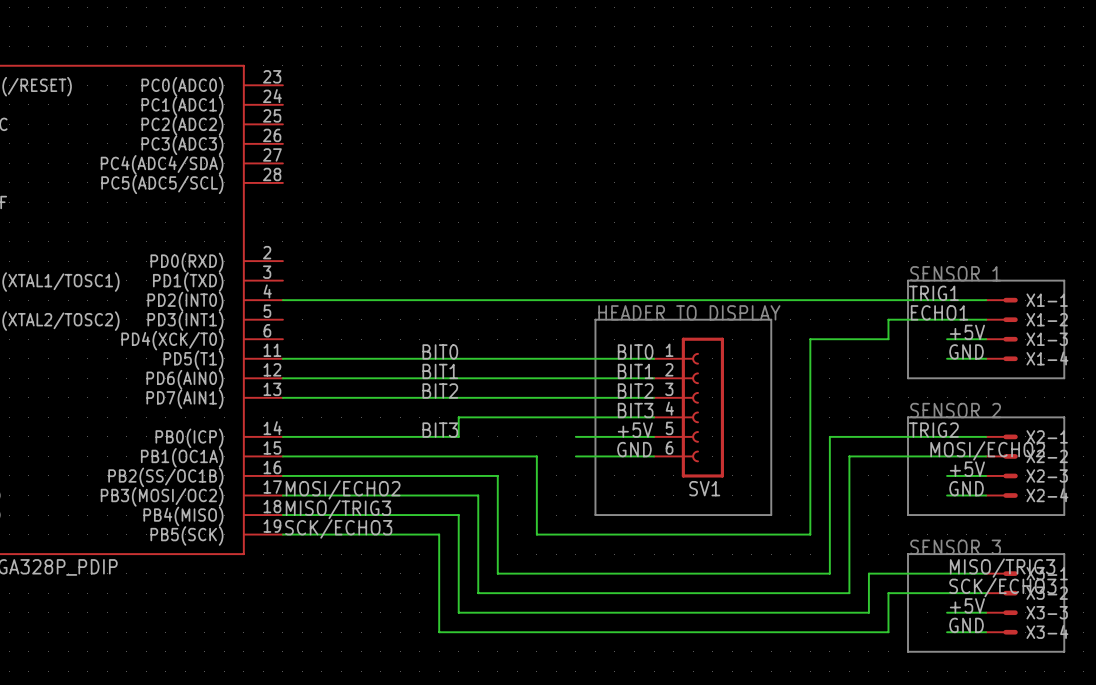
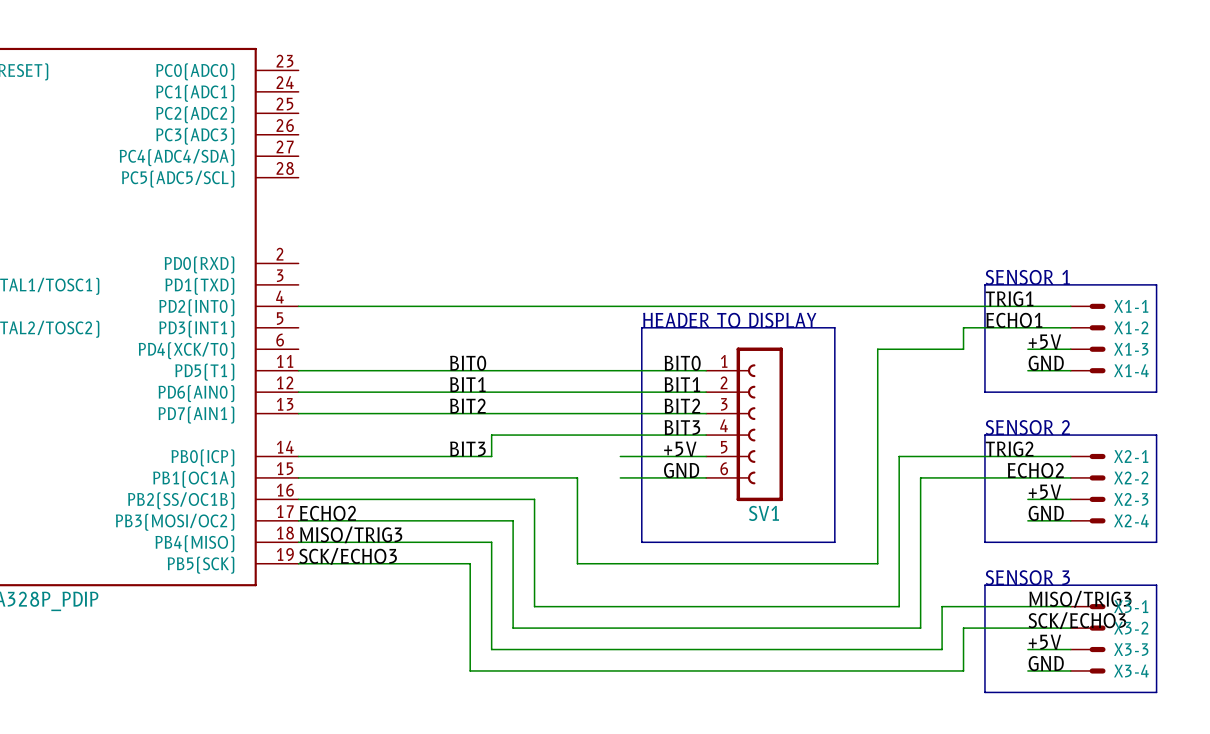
label: MOSI/ECHO2 (987, 450) -> ECHO2 (1035, 470)
label: MOSI/ECHO2 (343, 489) -> ECHO2 (328, 513)

